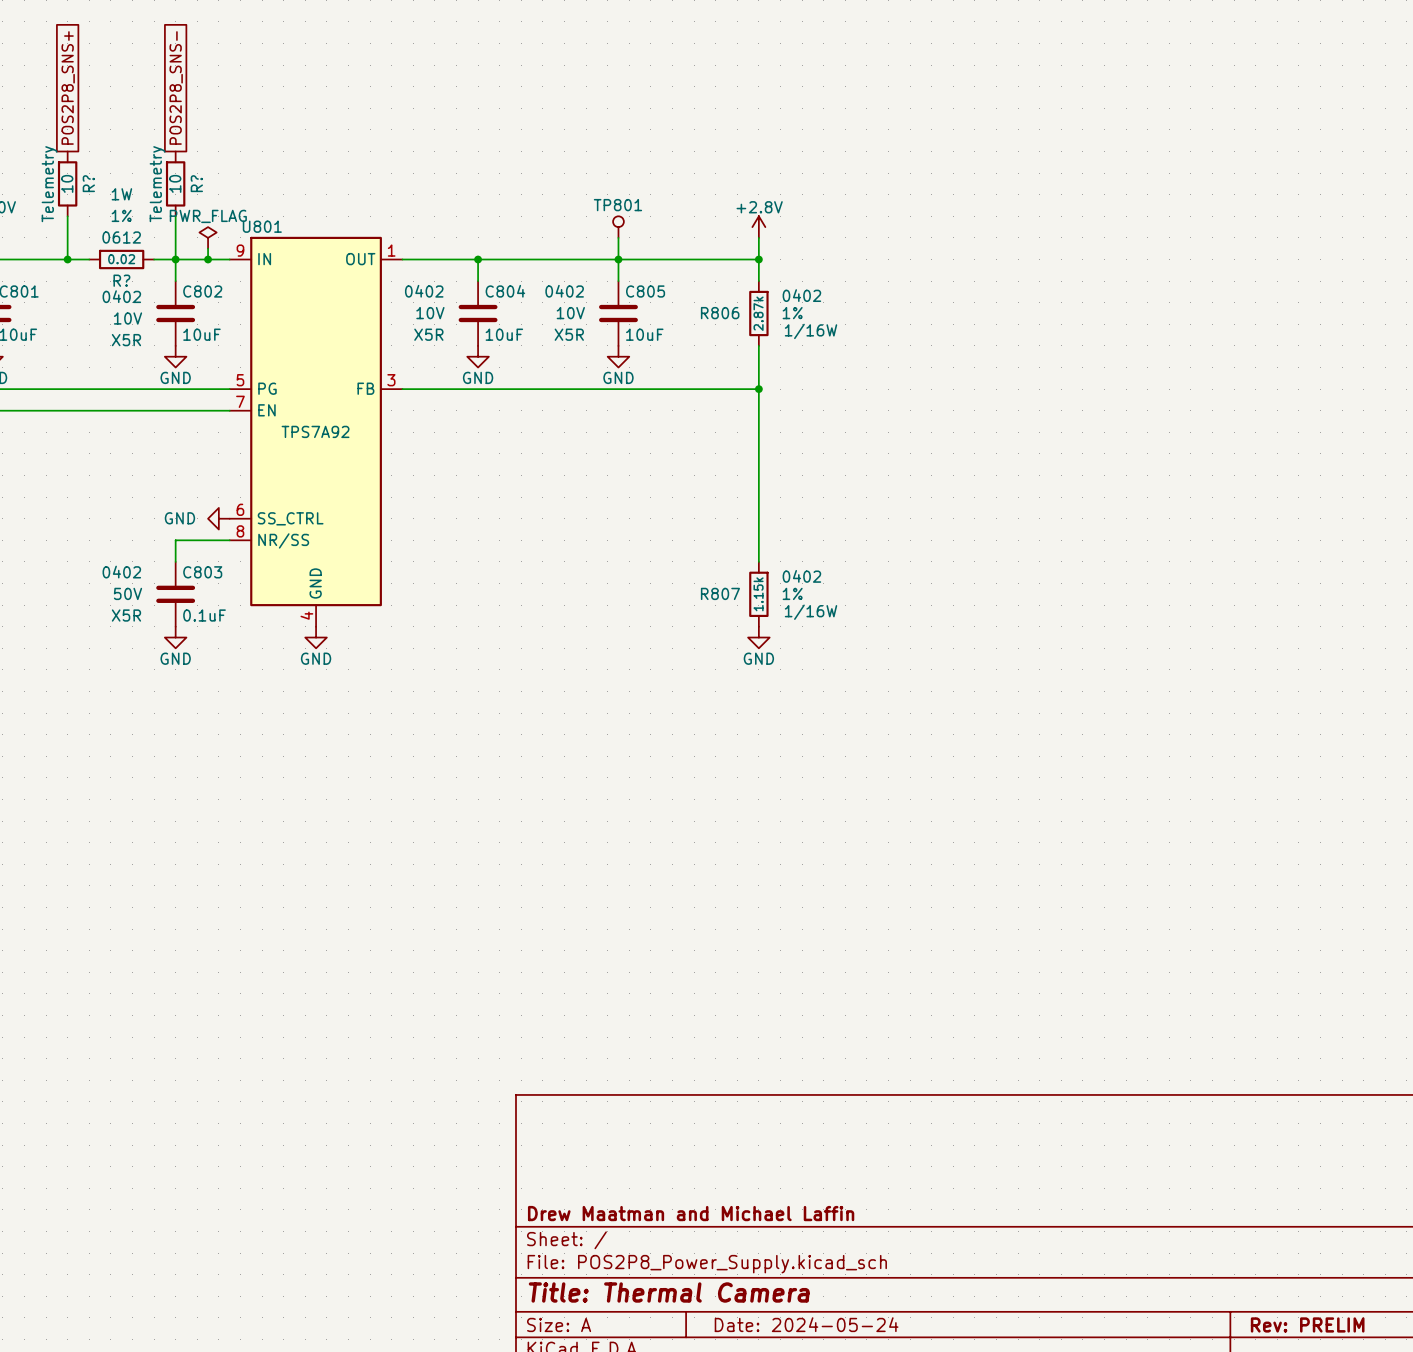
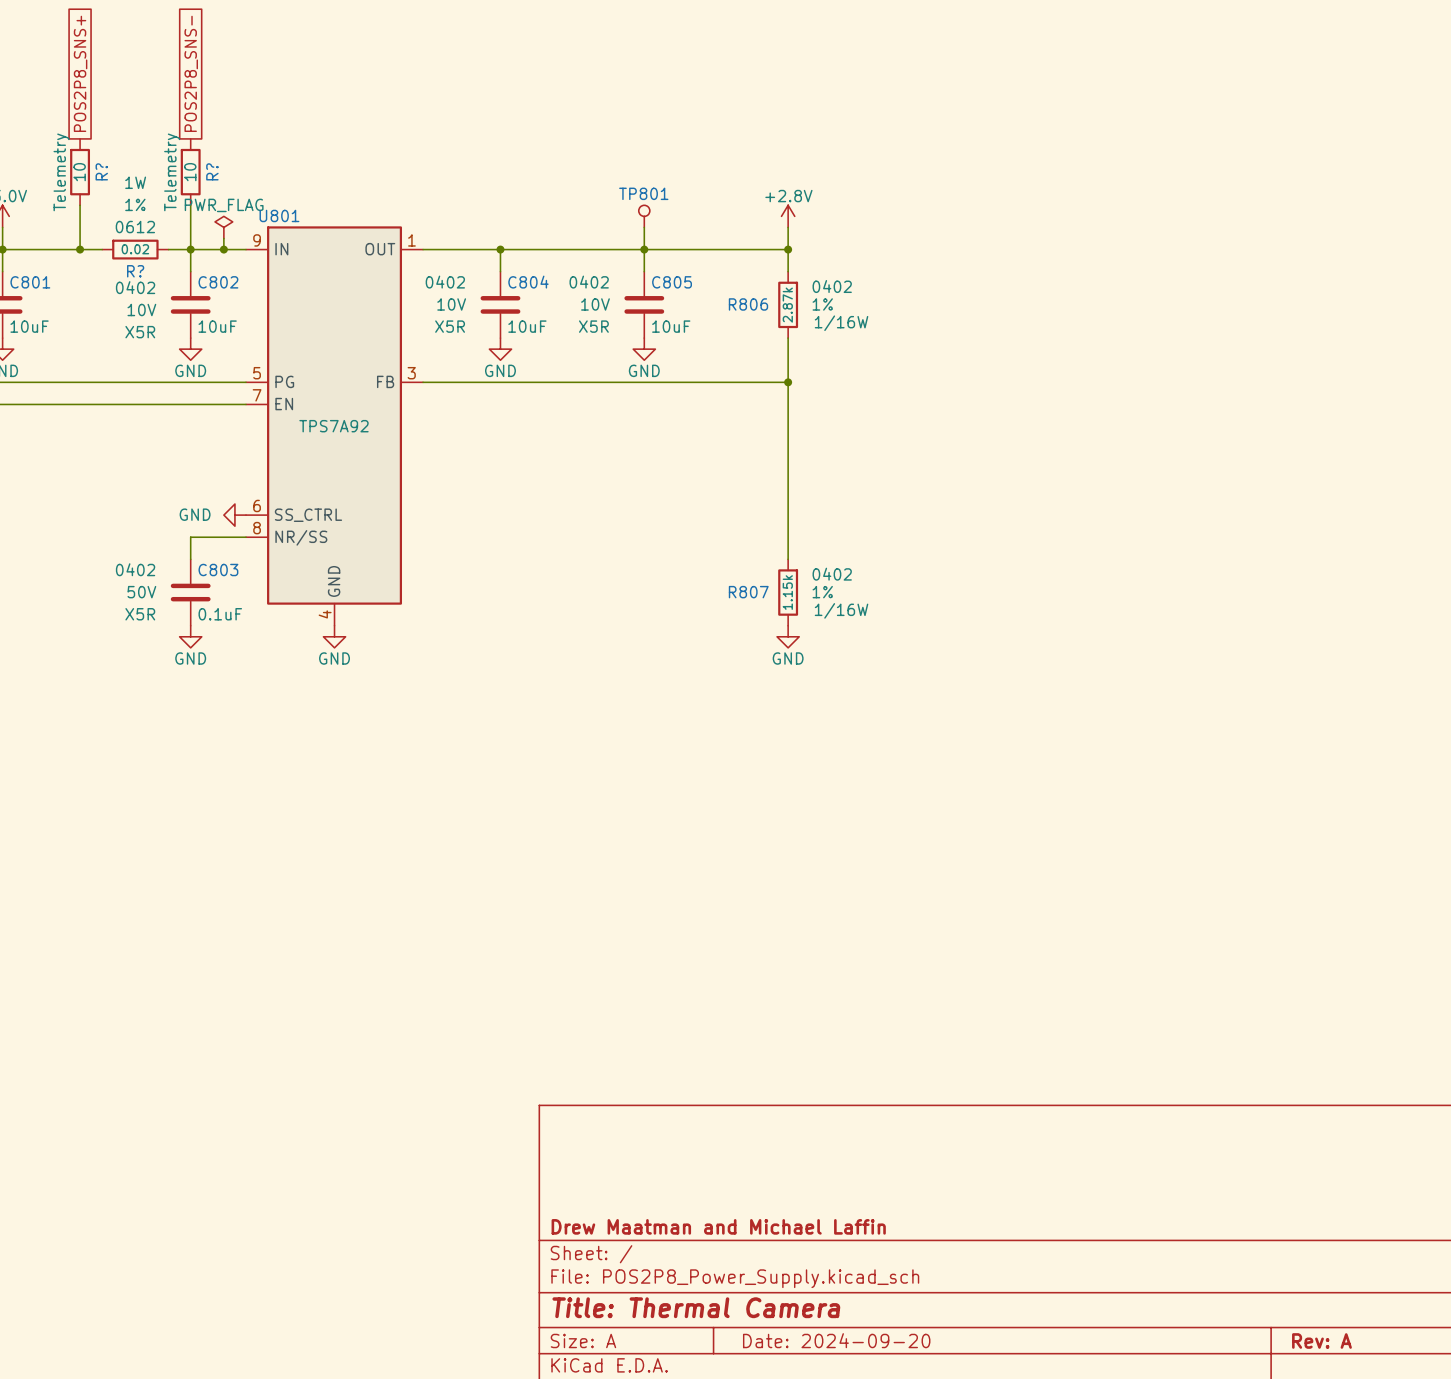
title block: Date: 2024-05-24 (806, 1324) -> Date: 2024-09-20 (836, 1340)
title block: Rev: PRELIM (1307, 1324) -> Rev: A (1321, 1340)

